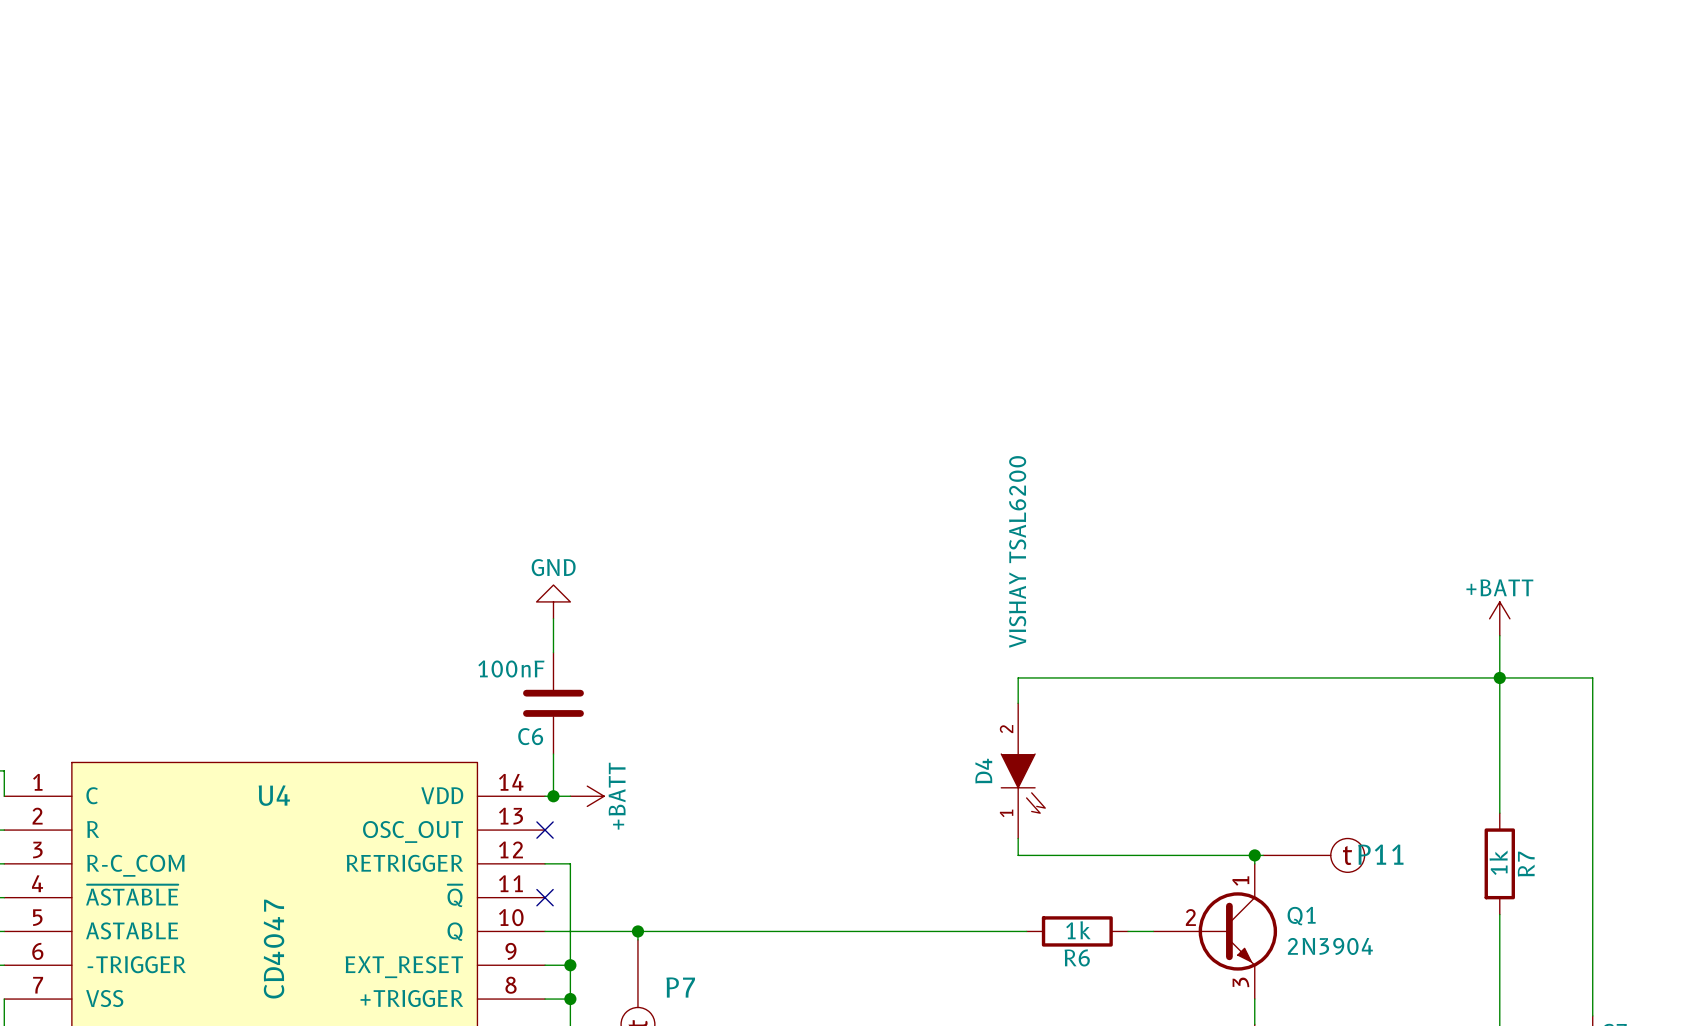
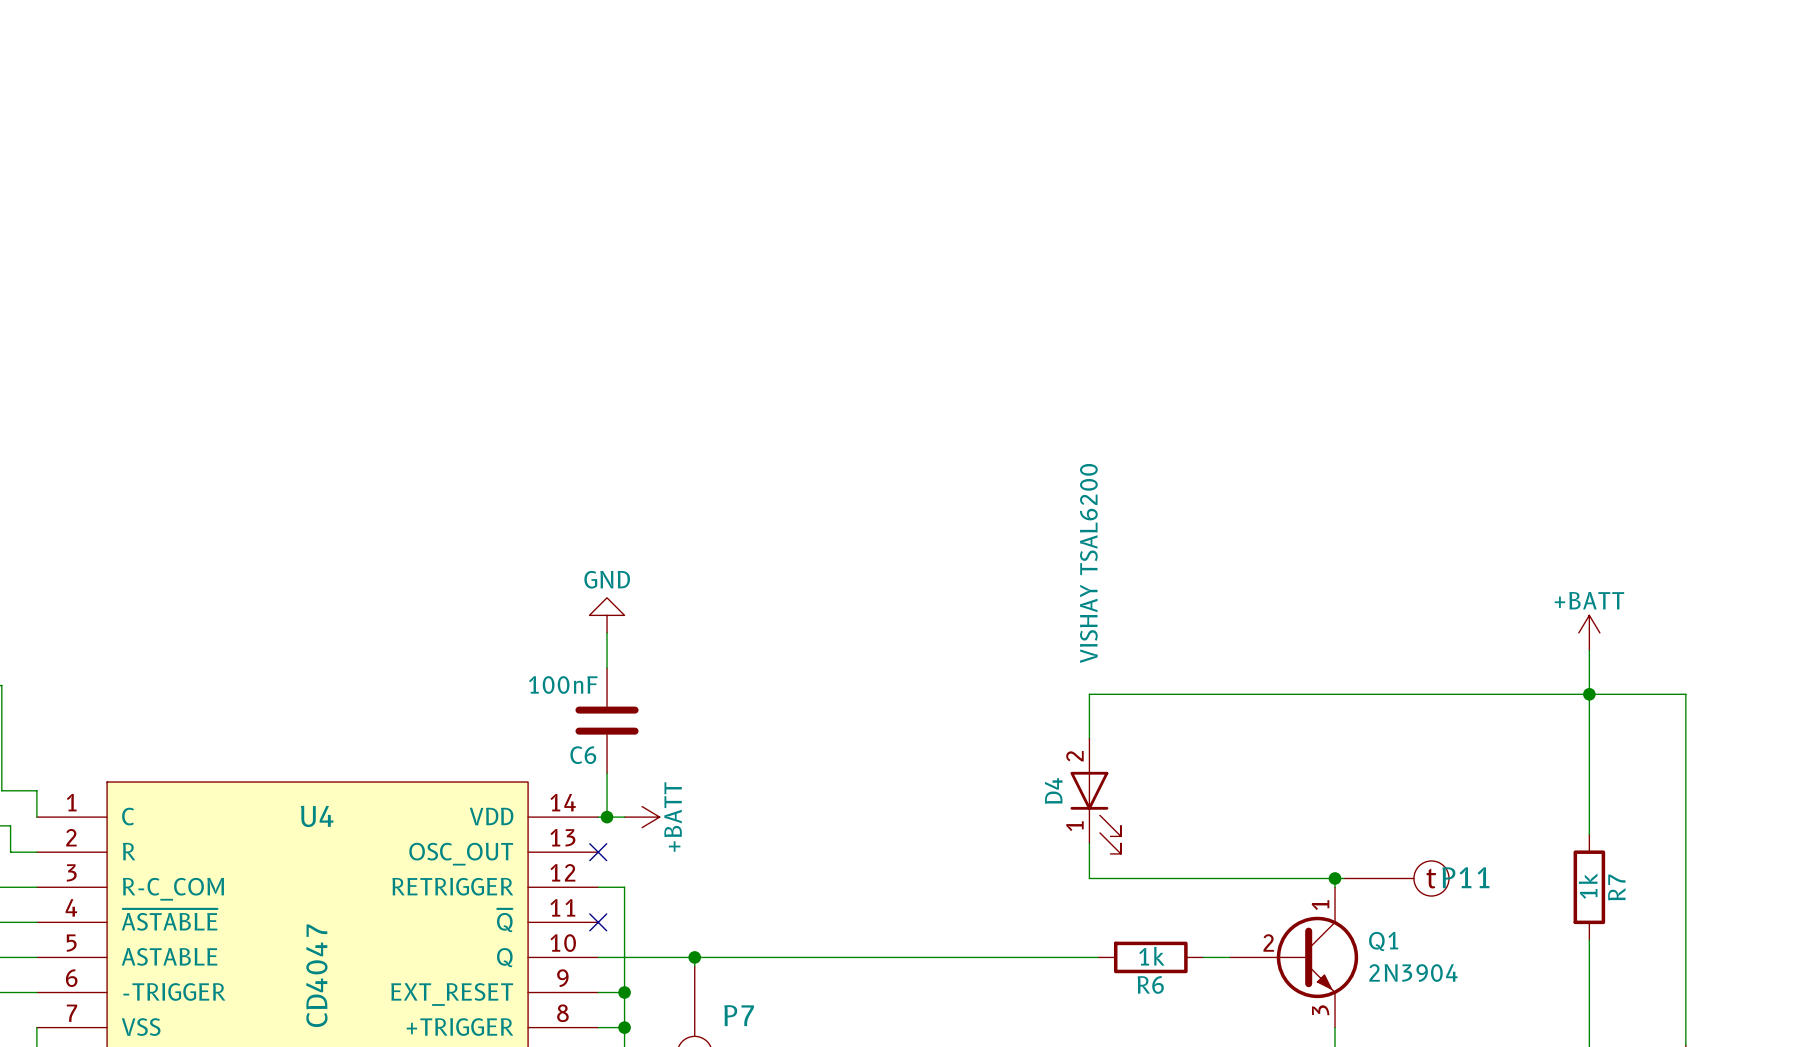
D4 symbol: [1001, 703, 1046, 839] -> [1070, 738, 1121, 854]

